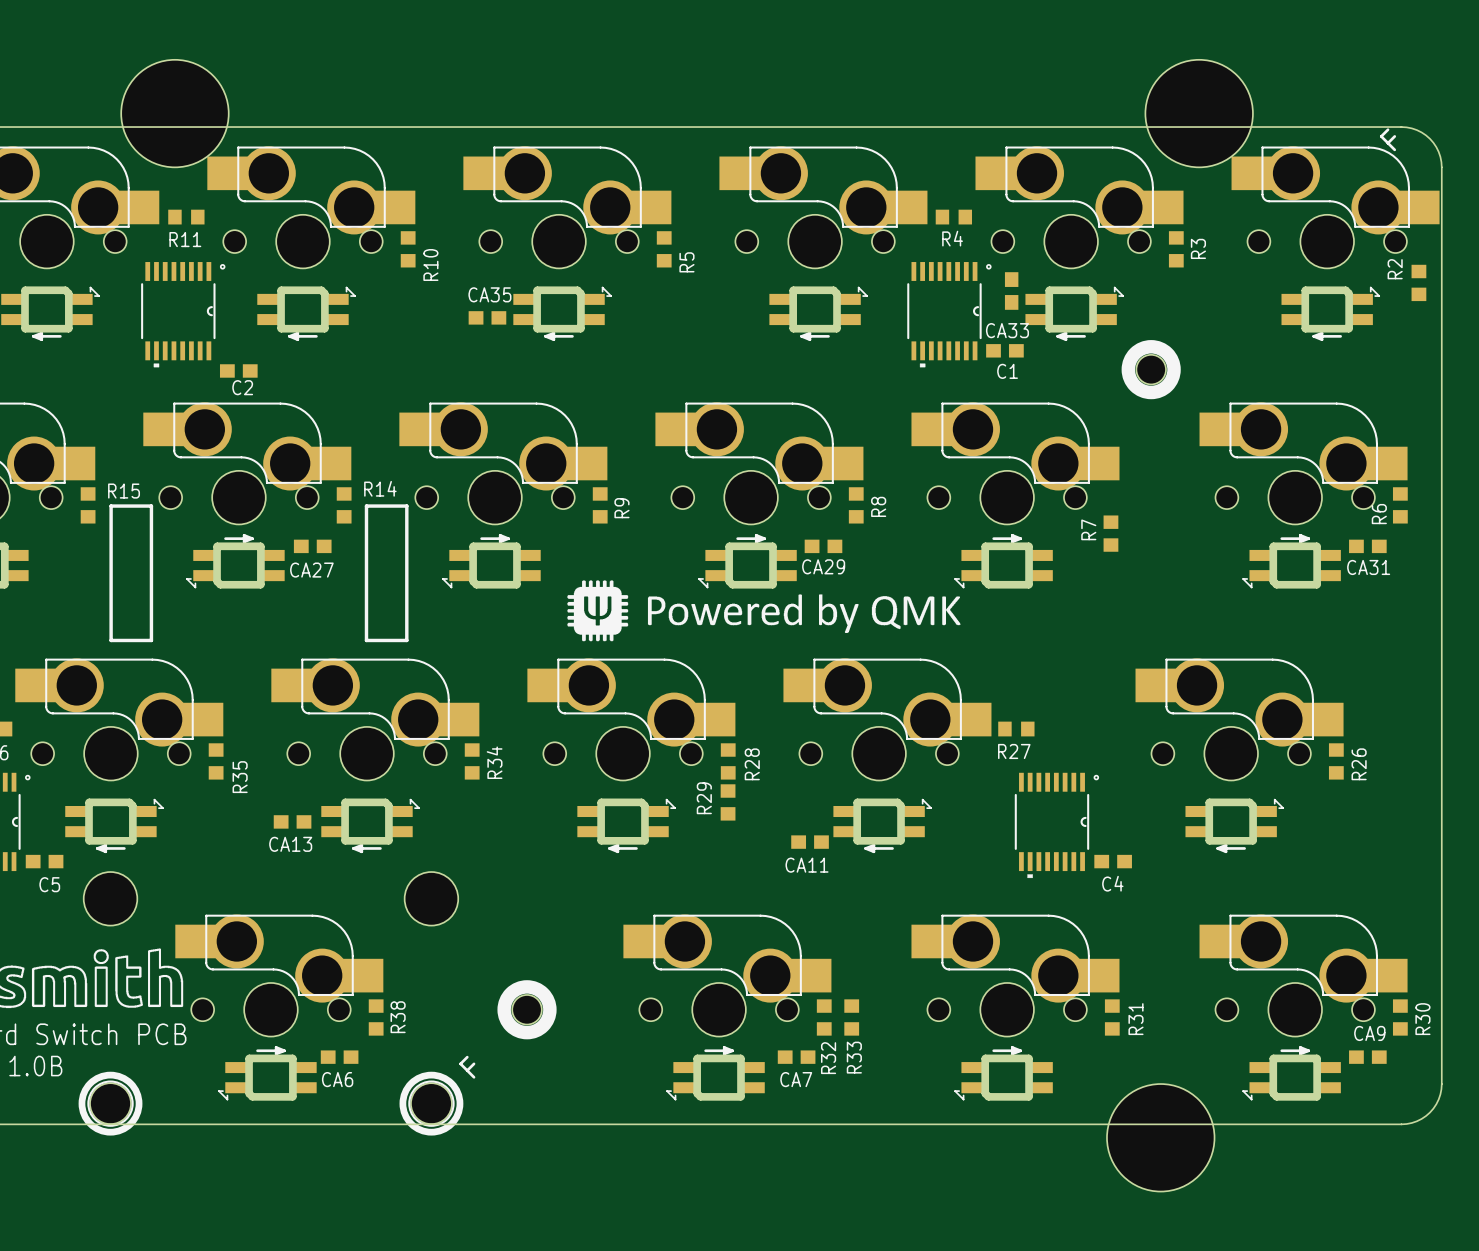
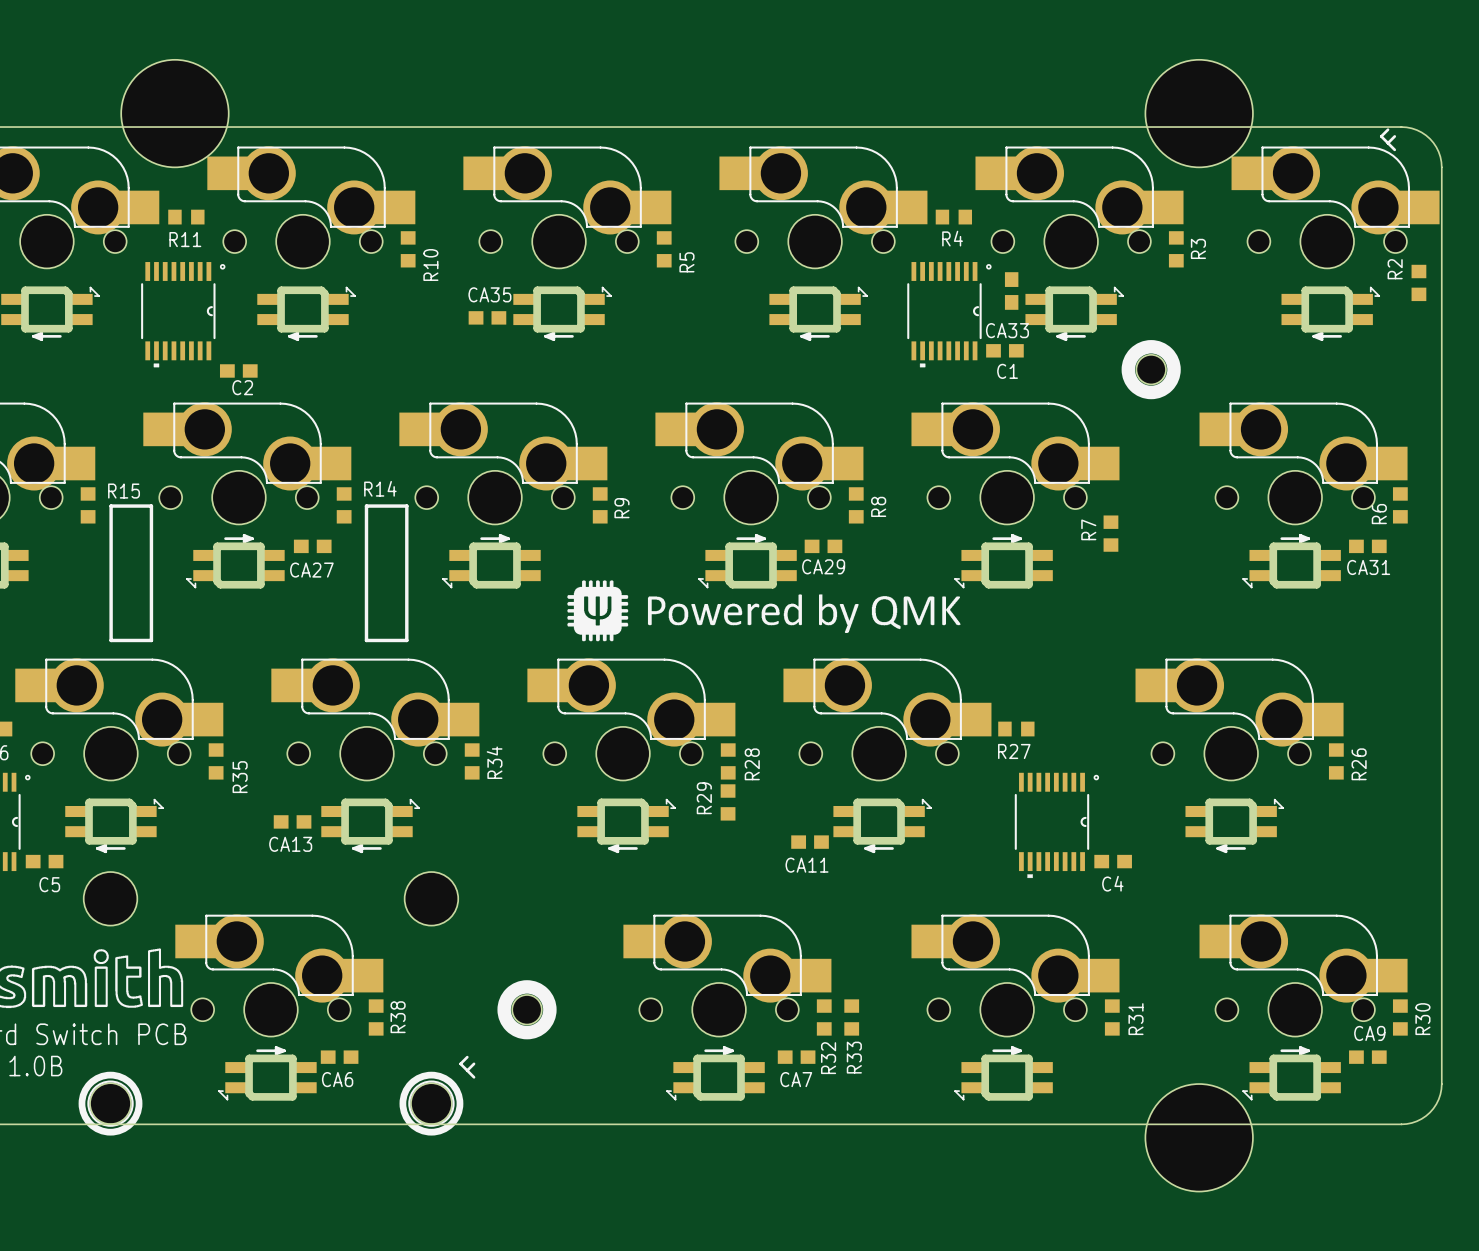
hole position: (1160, 1137) -> (1199, 1137)

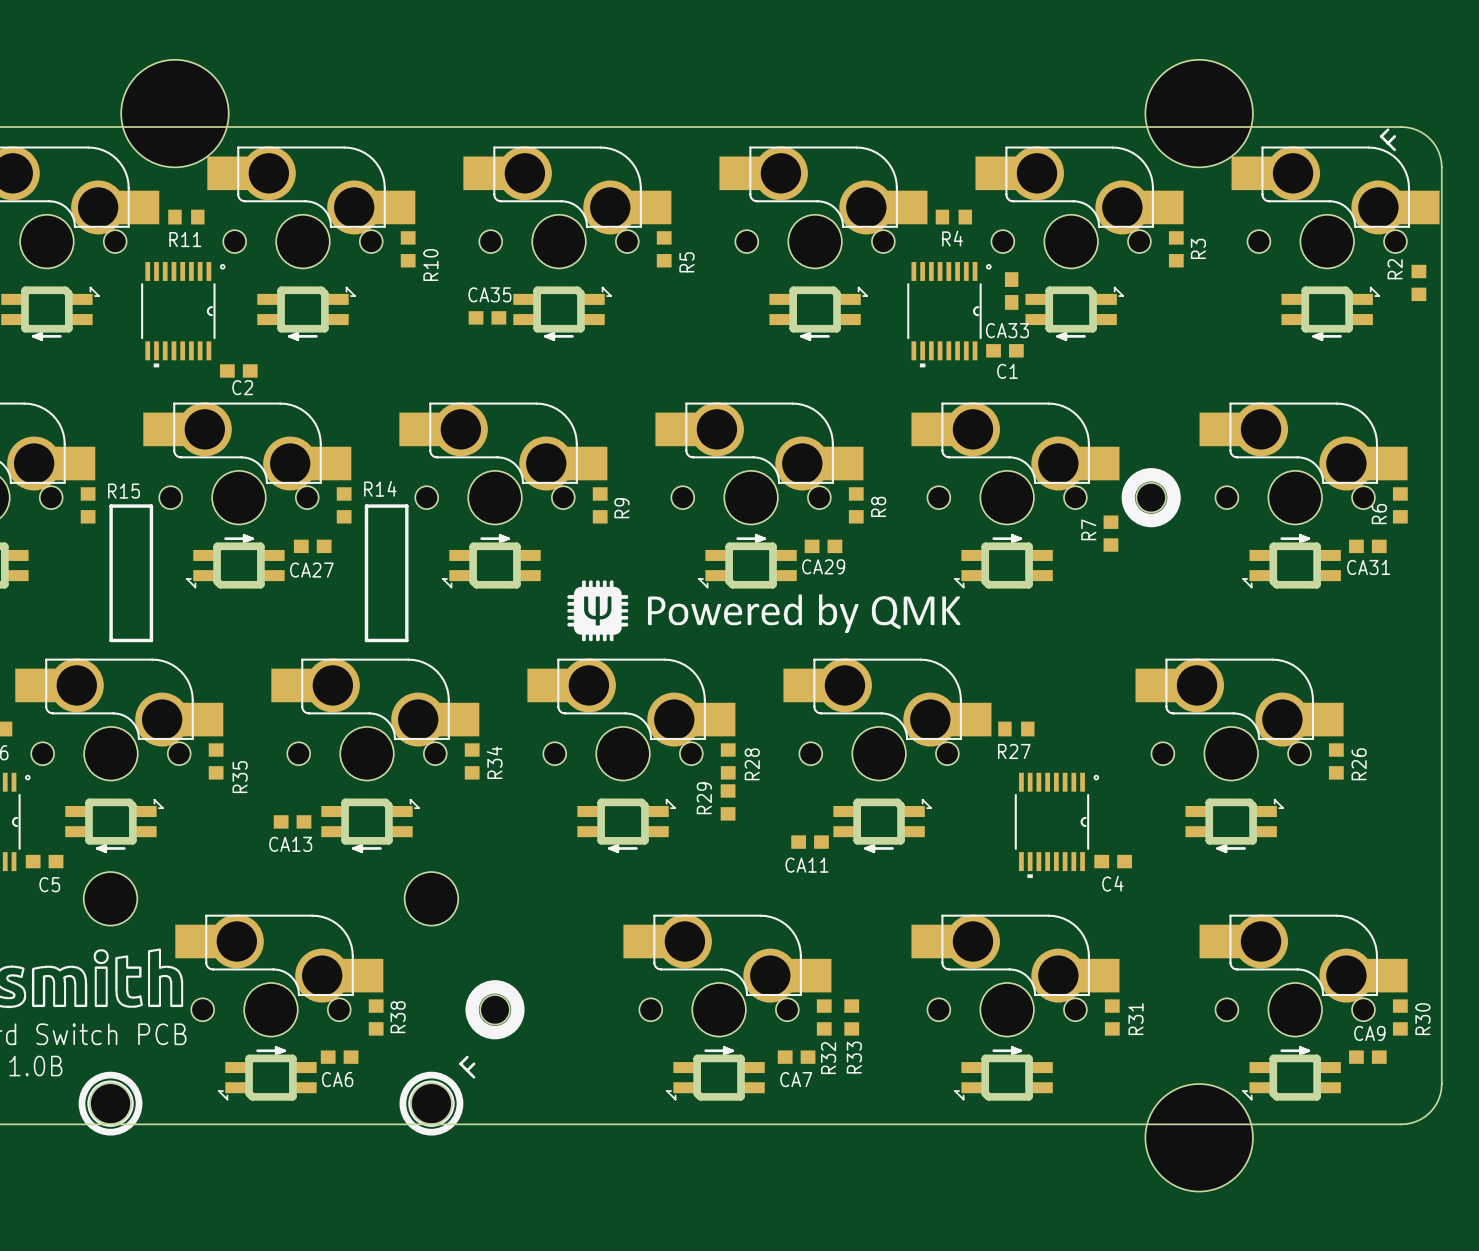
drawing position: (1151, 369) -> (1151, 497)
hole position: (1151, 369) -> (1151, 497)
drawing position: (527, 1009) -> (495, 1009)
hole position: (527, 1009) -> (495, 1009)

